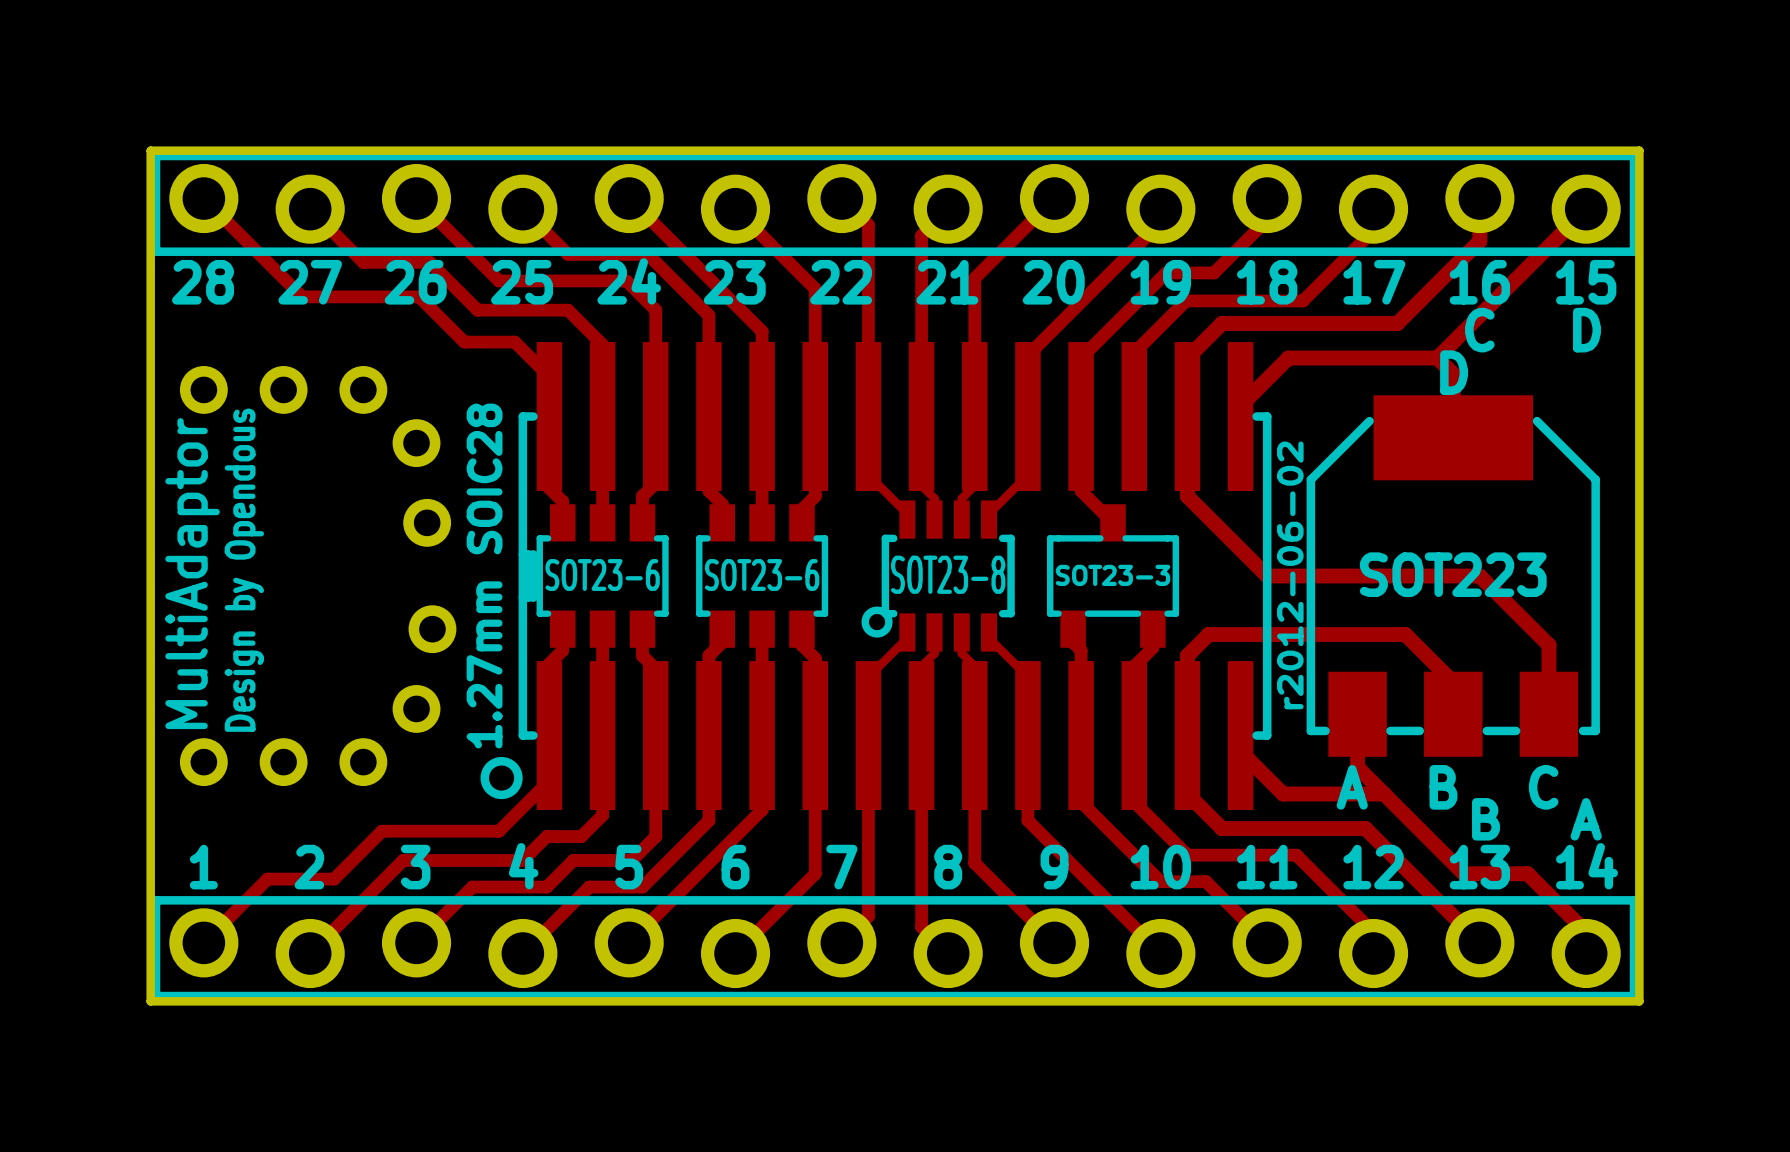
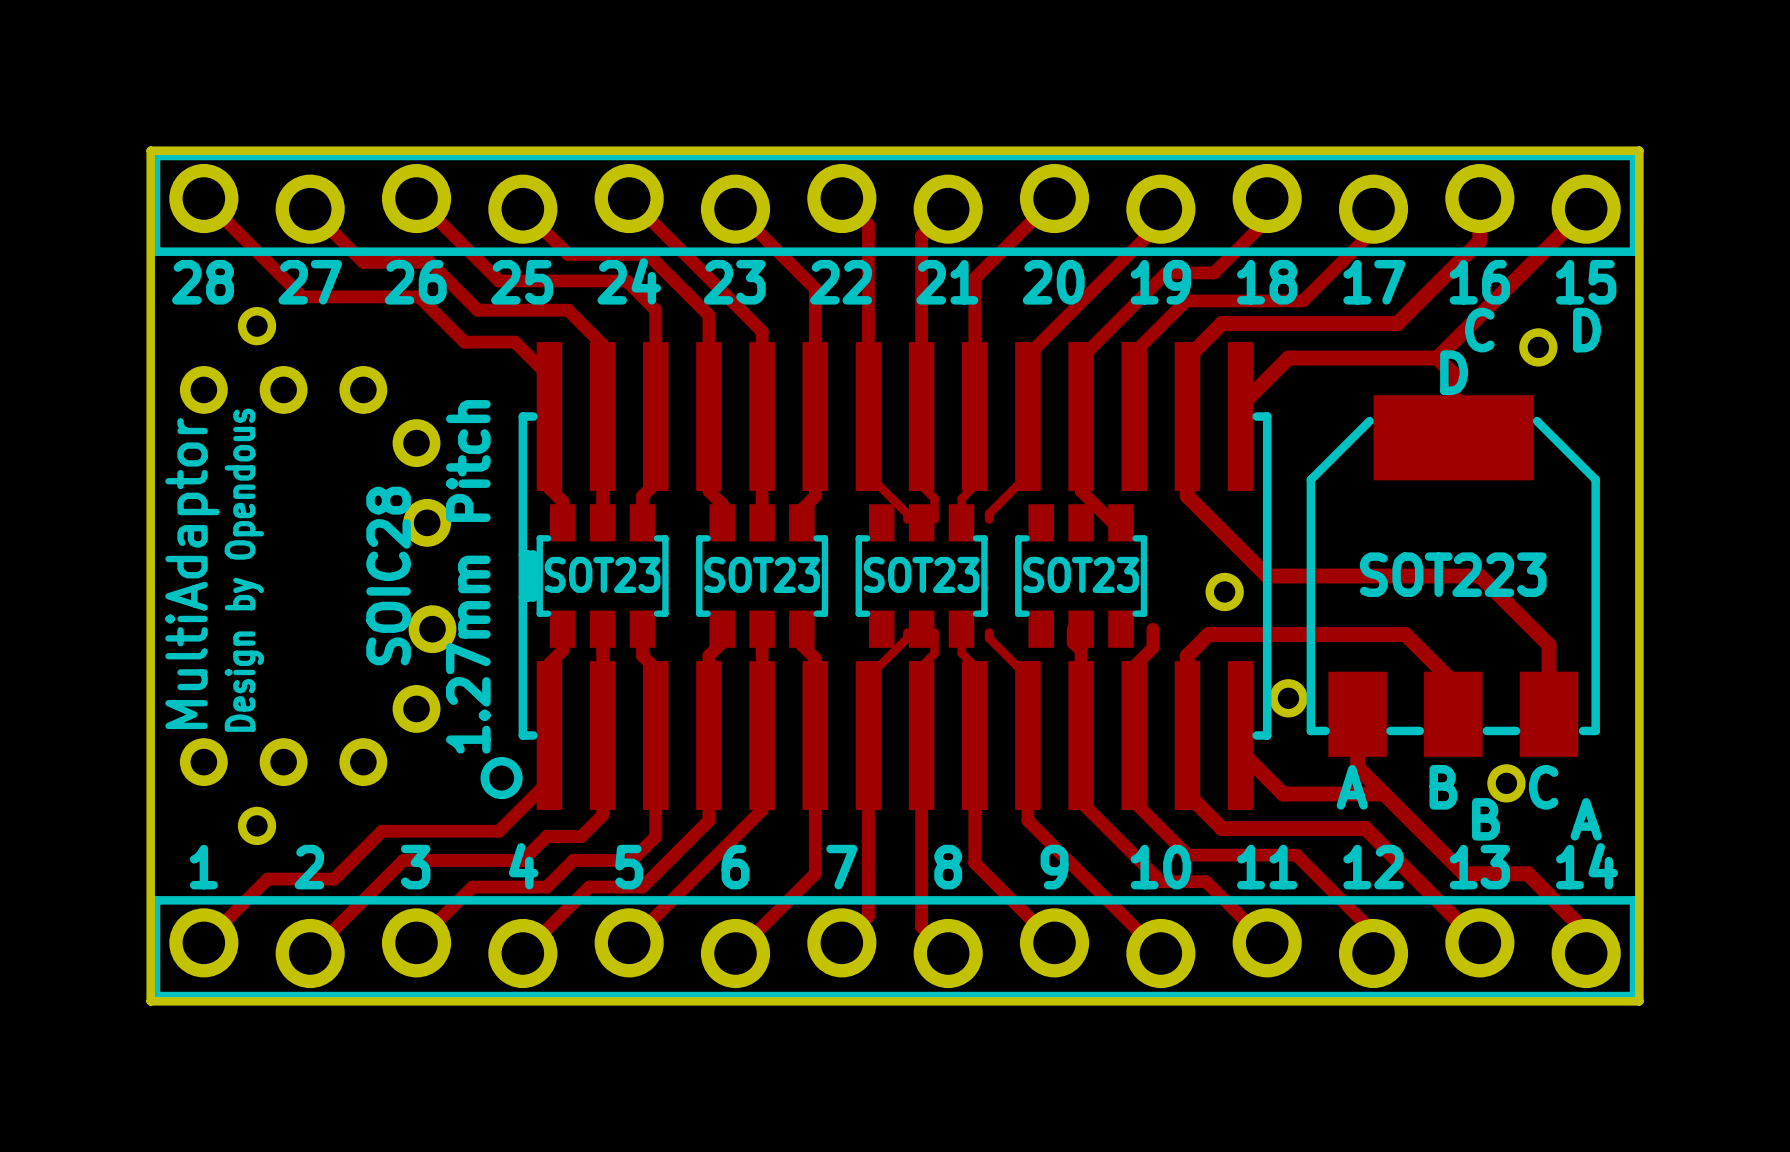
part: none -> (257, 326)
part: none -> (1538, 347)
part footprint: [861, 500, 1015, 652] -> [855, 504, 988, 648]
part footprint: [1046, 504, 1180, 648] -> [1015, 504, 1148, 648]
part value: SOT23-6 (602, 574) -> none
text: none -> SOT23 (602, 574)
part value: SOT23-6 (762, 574) -> none
text: none -> SOT23 (762, 574)
text: none -> SOT23 (921, 574)
part value: SOT23-8 (948, 574) -> none
text: none -> SOT23 (1081, 574)
part value: SOT23-3 (1113, 575) -> none
text: r2012-06-02 (1290, 575) -> none
text: none -> SOIC28 (388, 576)
text: 1.27mm SOIC28 (484, 576) -> 1.27mm Pitch (468, 576)
part: none -> (1224, 591)
part: none -> (1288, 698)
part: none -> (1506, 783)
part: none -> (257, 825)

